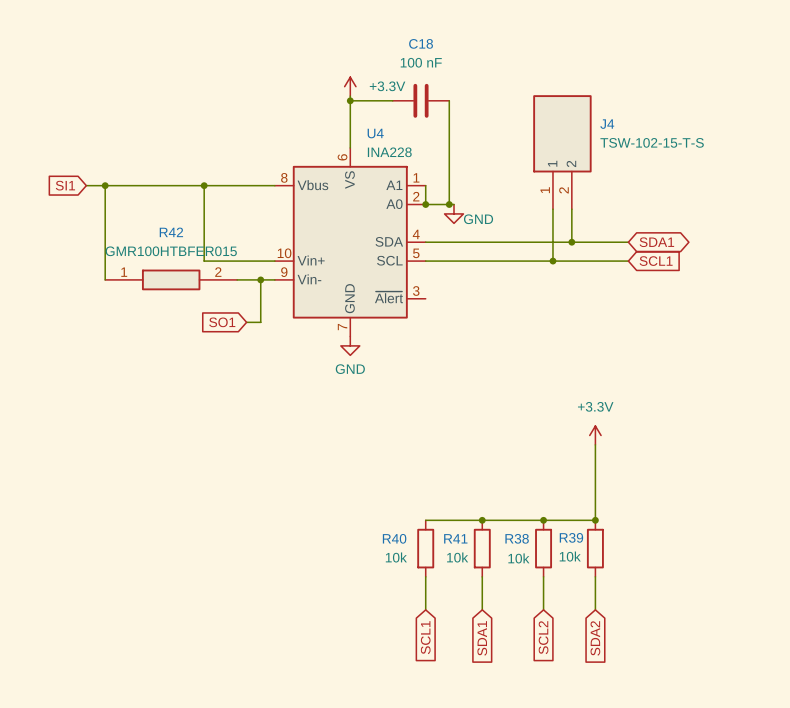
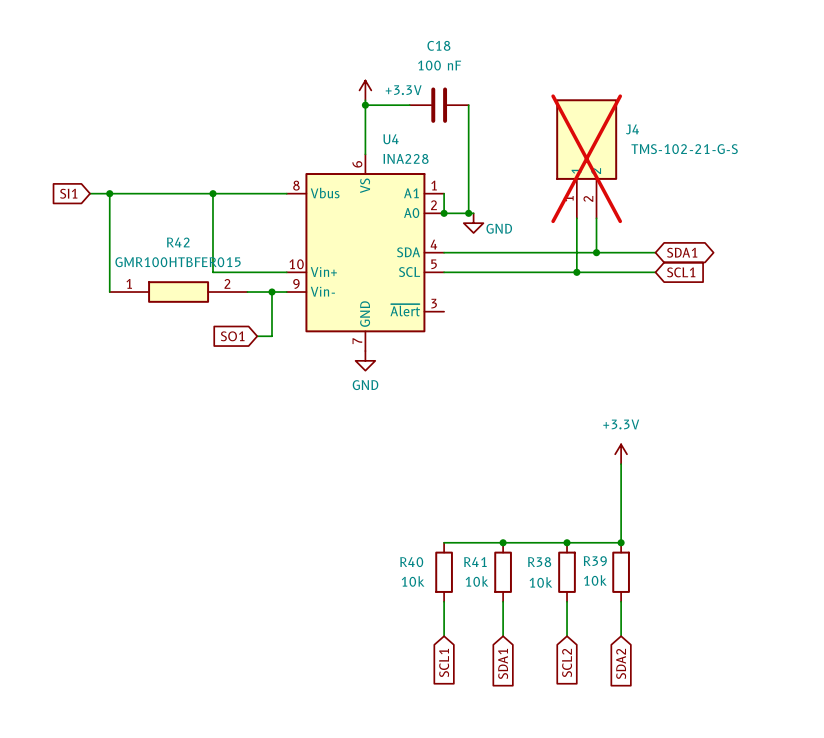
J4 value: TSW-102-15-T-S (652, 142) -> TMS-102-21-G-S (684, 149)
J4 do-not-place cross: none -> (586, 158)

